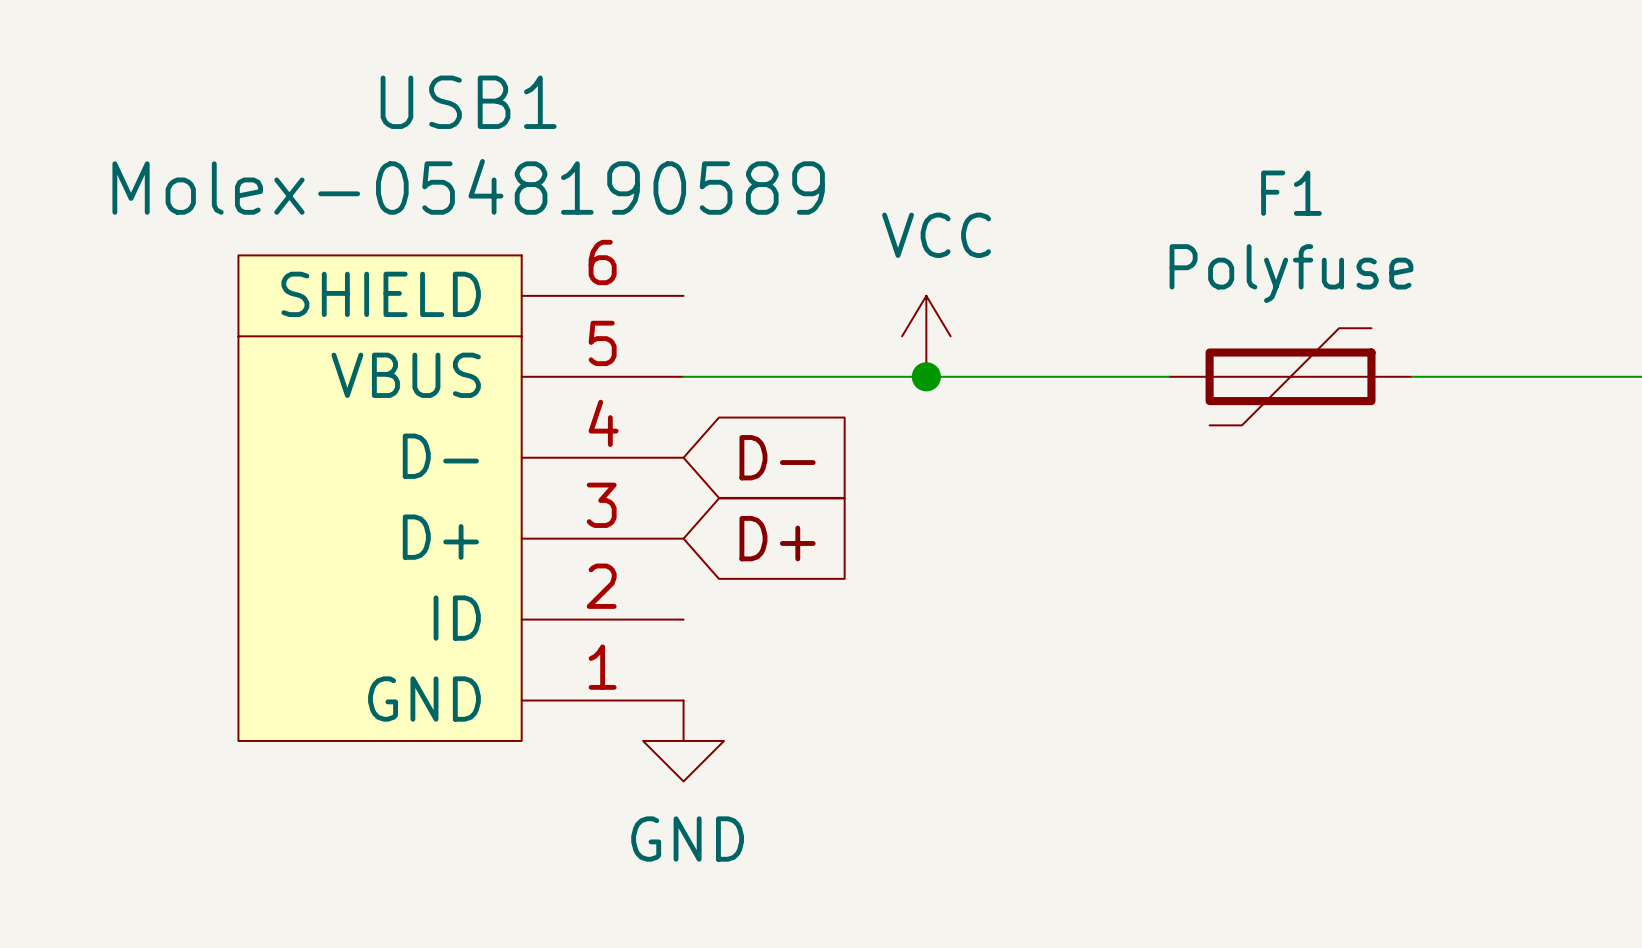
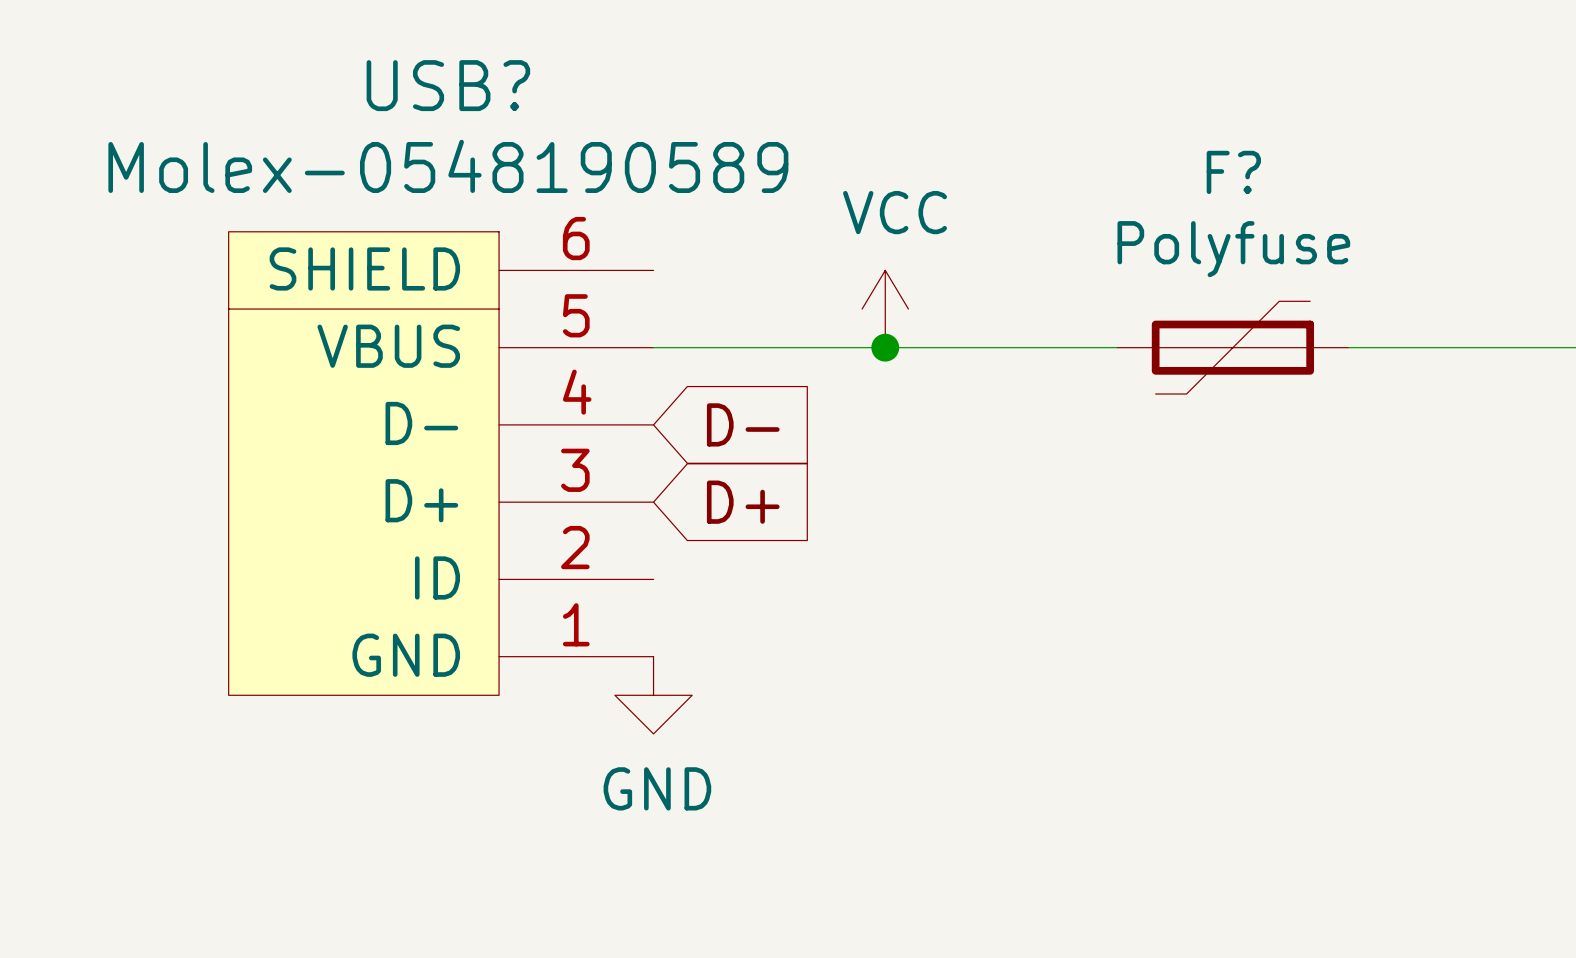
USB1 name: USB1 (468, 102) -> USB? (448, 85)
F1 name: F1 (1291, 193) -> F? (1233, 172)

